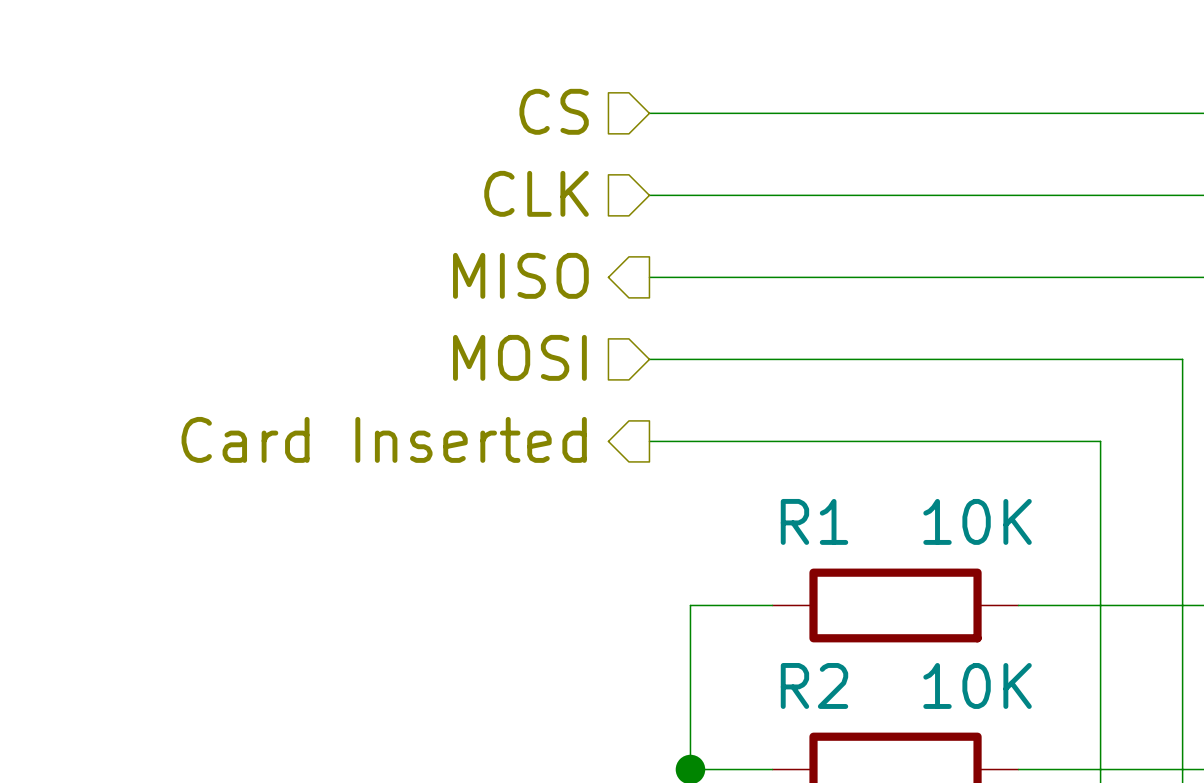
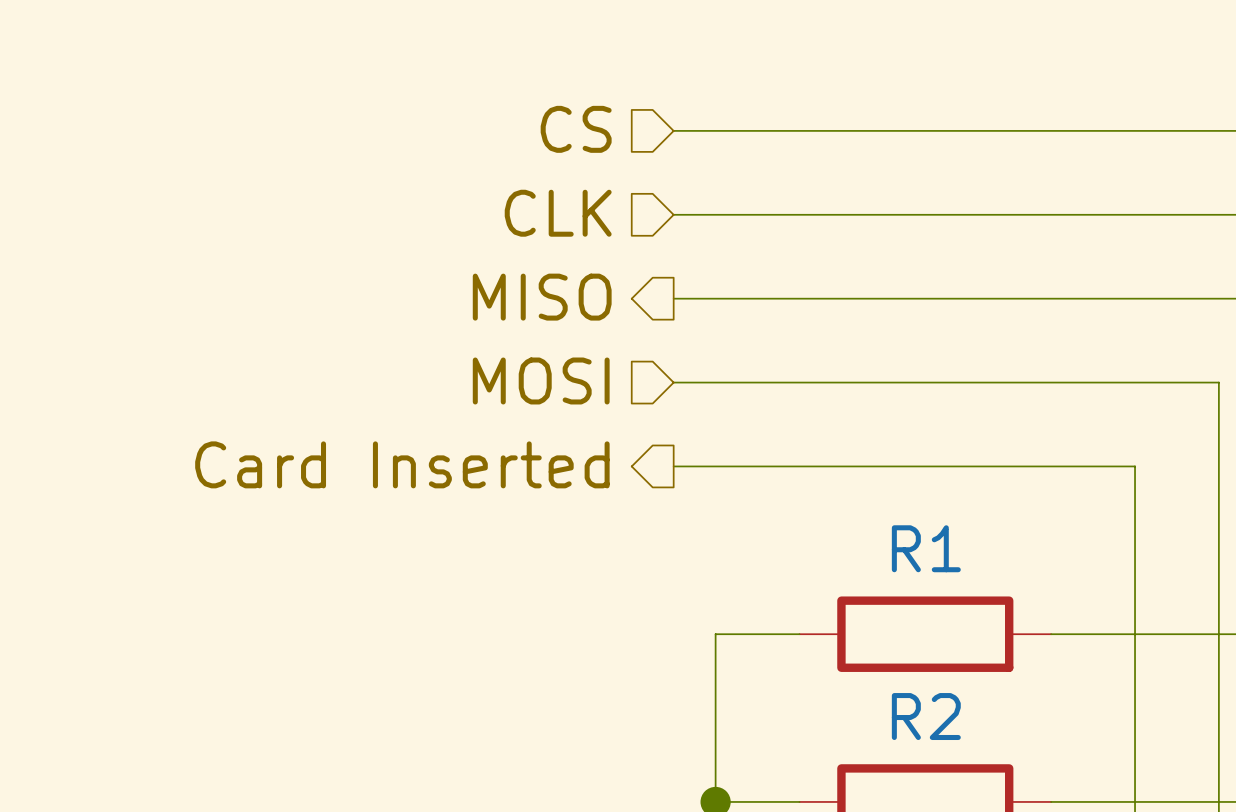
R1 name position: R1 (814, 521) -> R1 (926, 548)
R1 value: 10K (977, 521) -> none
R2 name position: R2 (814, 685) -> R2 (926, 716)
R2 value: 10K (977, 685) -> none

